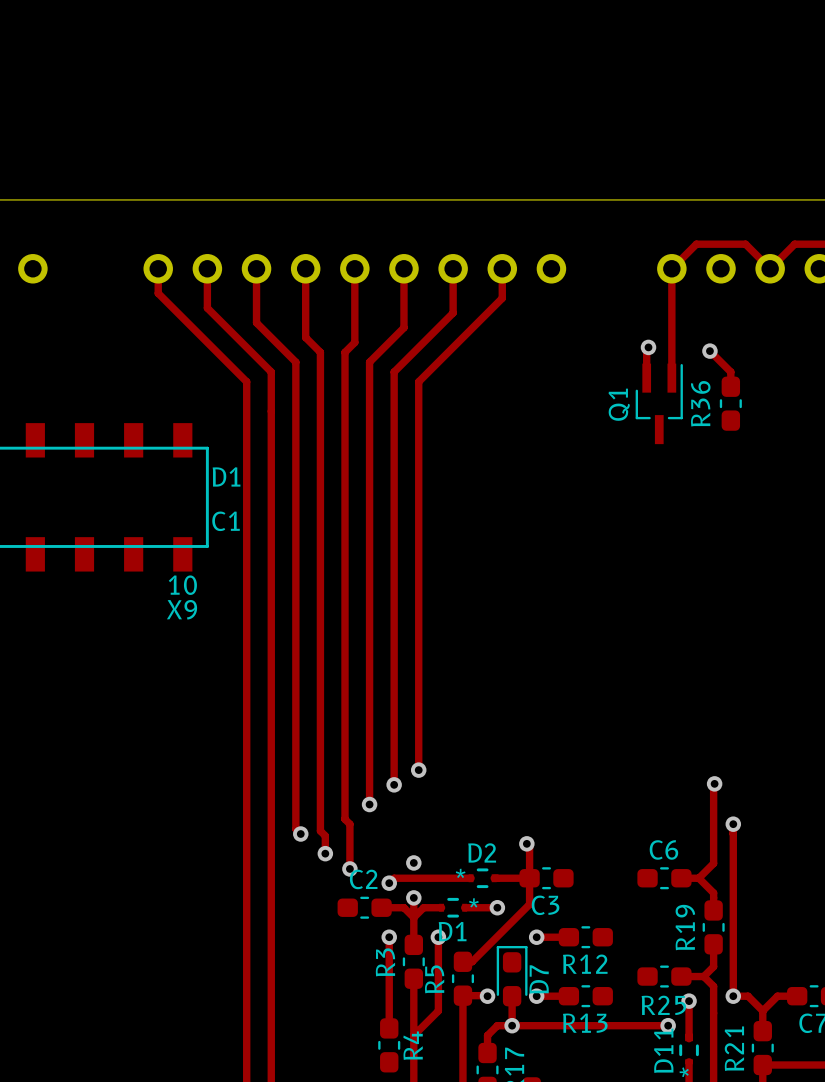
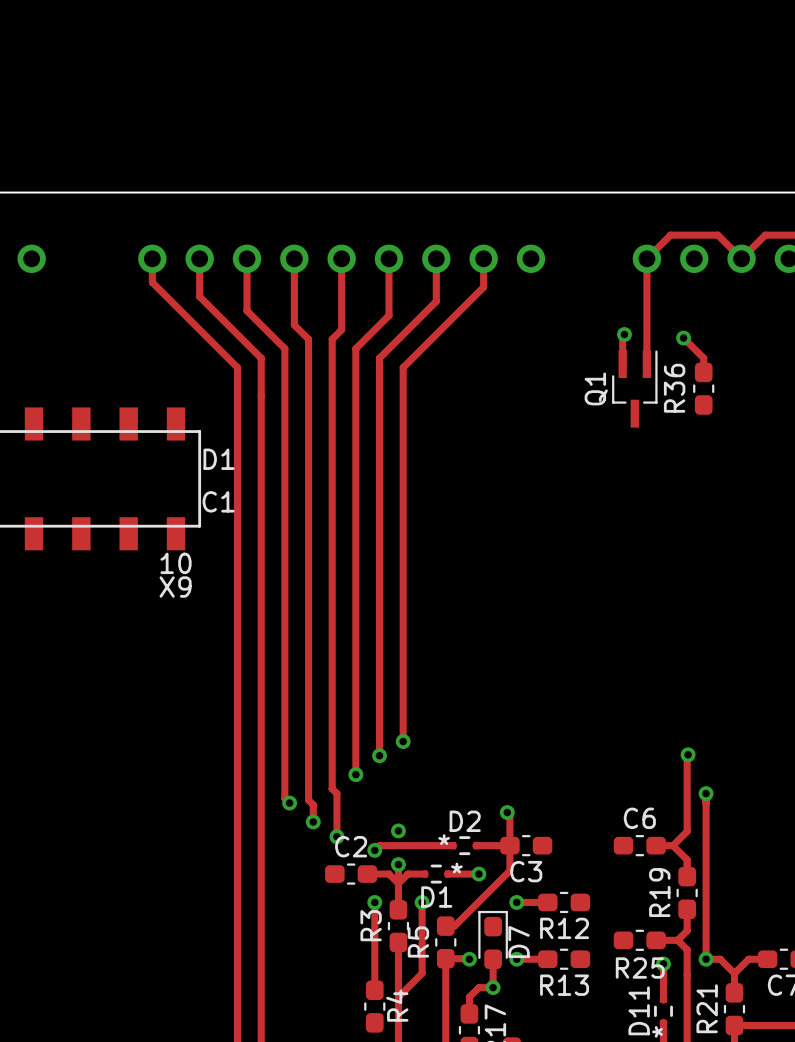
track: (512, 1025) (668, 1025) -> none
via: (668, 1025) -> none

